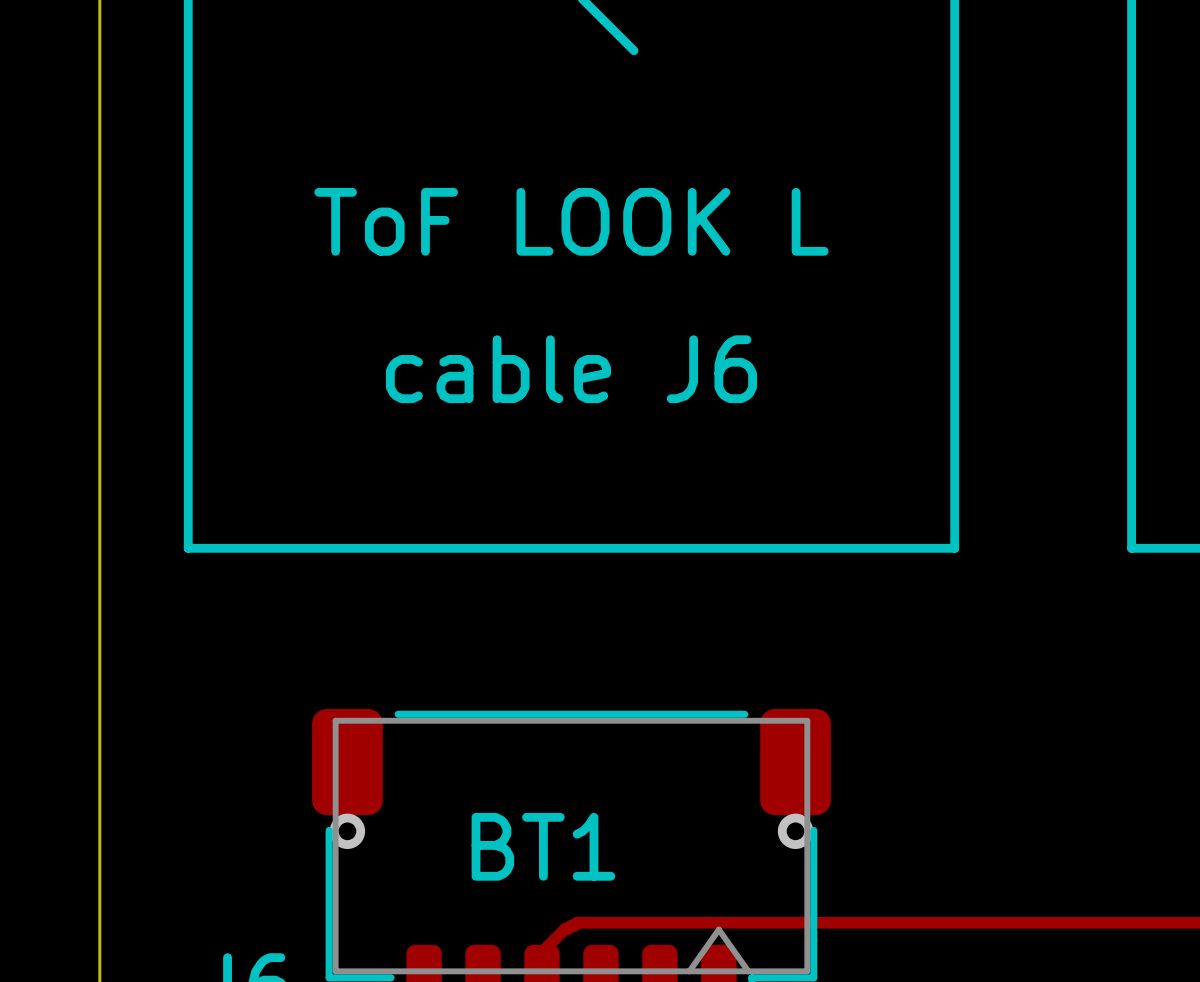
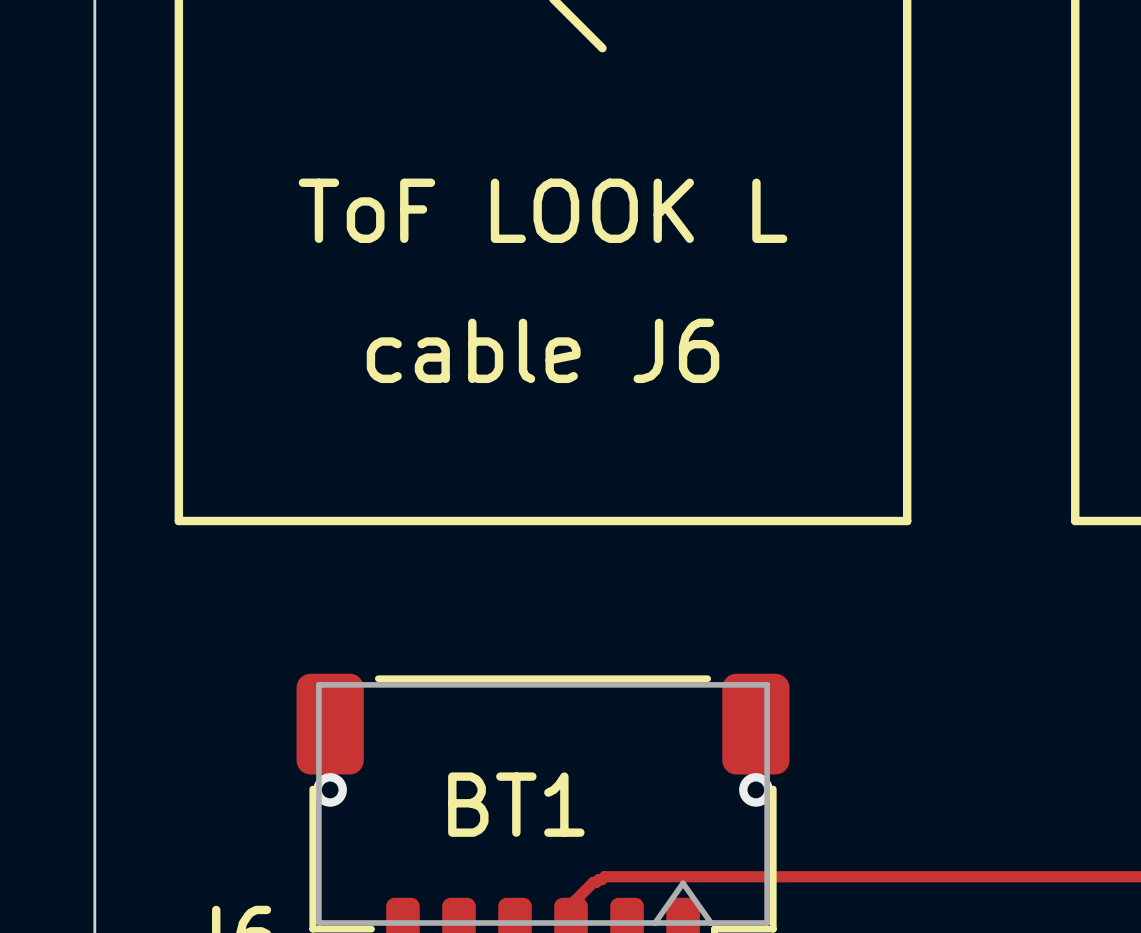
track: (636, 922) (577, 922) (565, 928) (542, 952) (542, 955) -> (604, 876) (593, 882) (571, 904) (571, 907)

